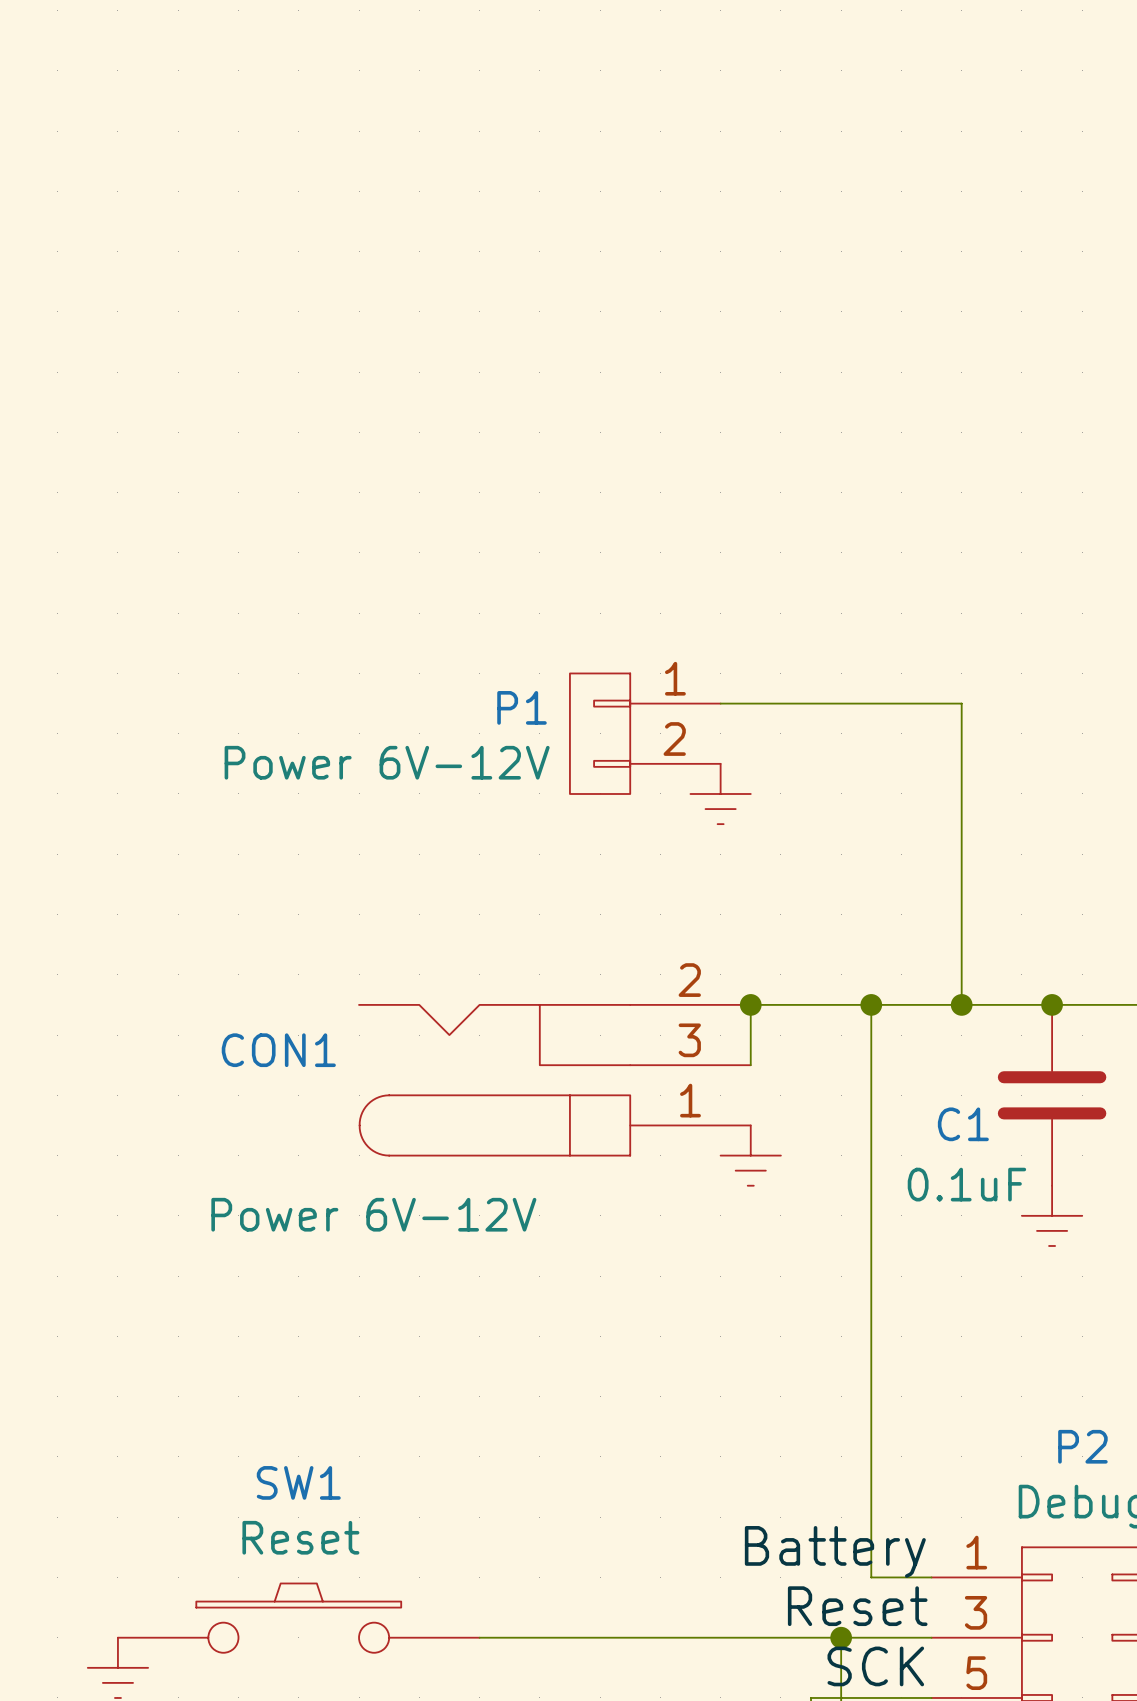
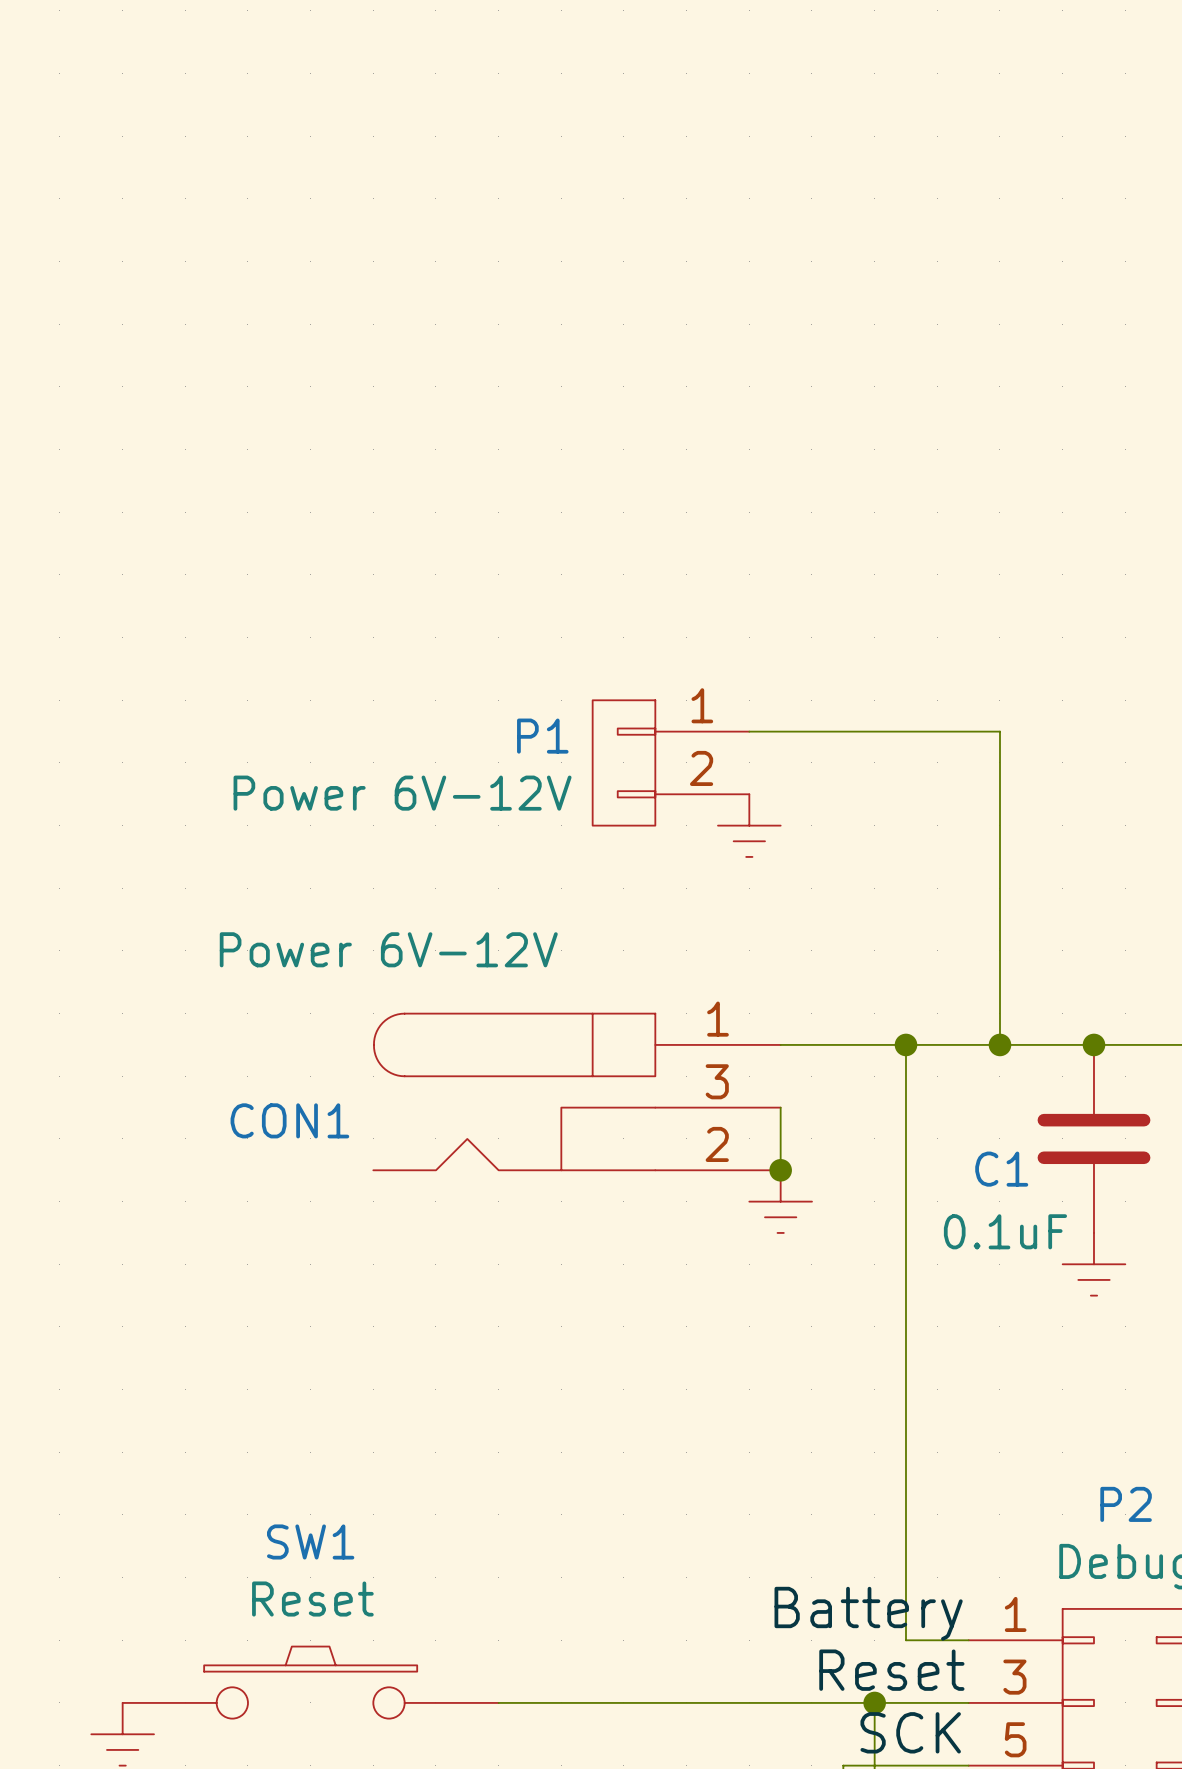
wire: (750, 1004) (750, 1065) -> (780, 1170) (780, 1107)
junction position: (750, 1004) -> (780, 1170)
CON1 flip: as is (494, 1080) -> up-down (514, 1091)

